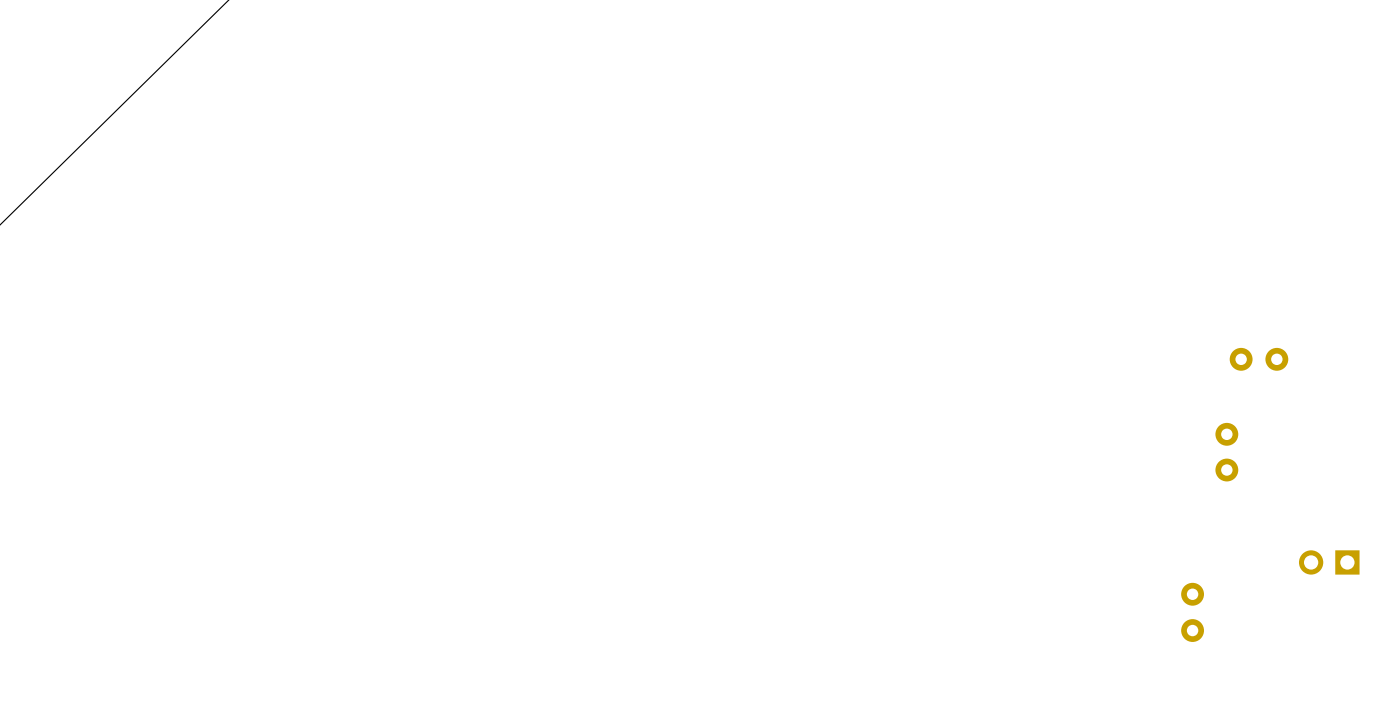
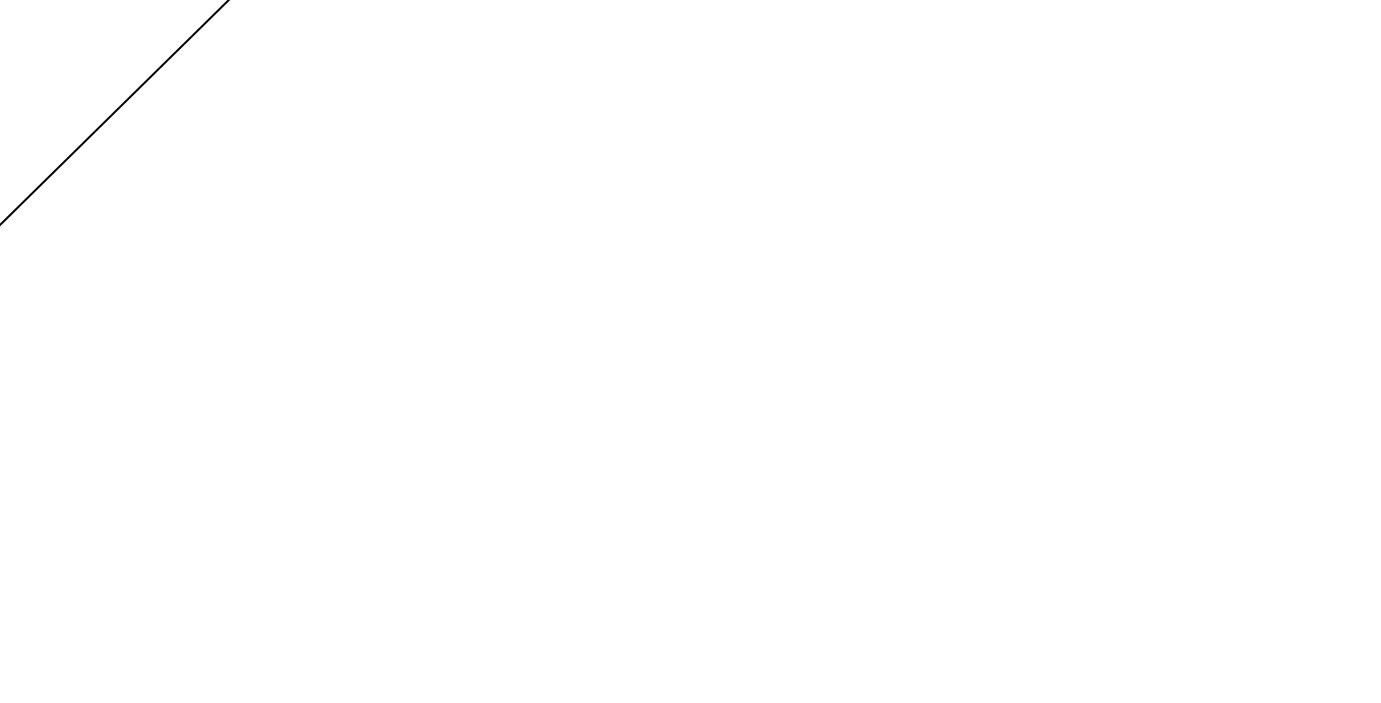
part: (1258, 359) -> none
part: (1226, 452) -> none
part: (1329, 562) -> none
part: (1192, 612) -> none

